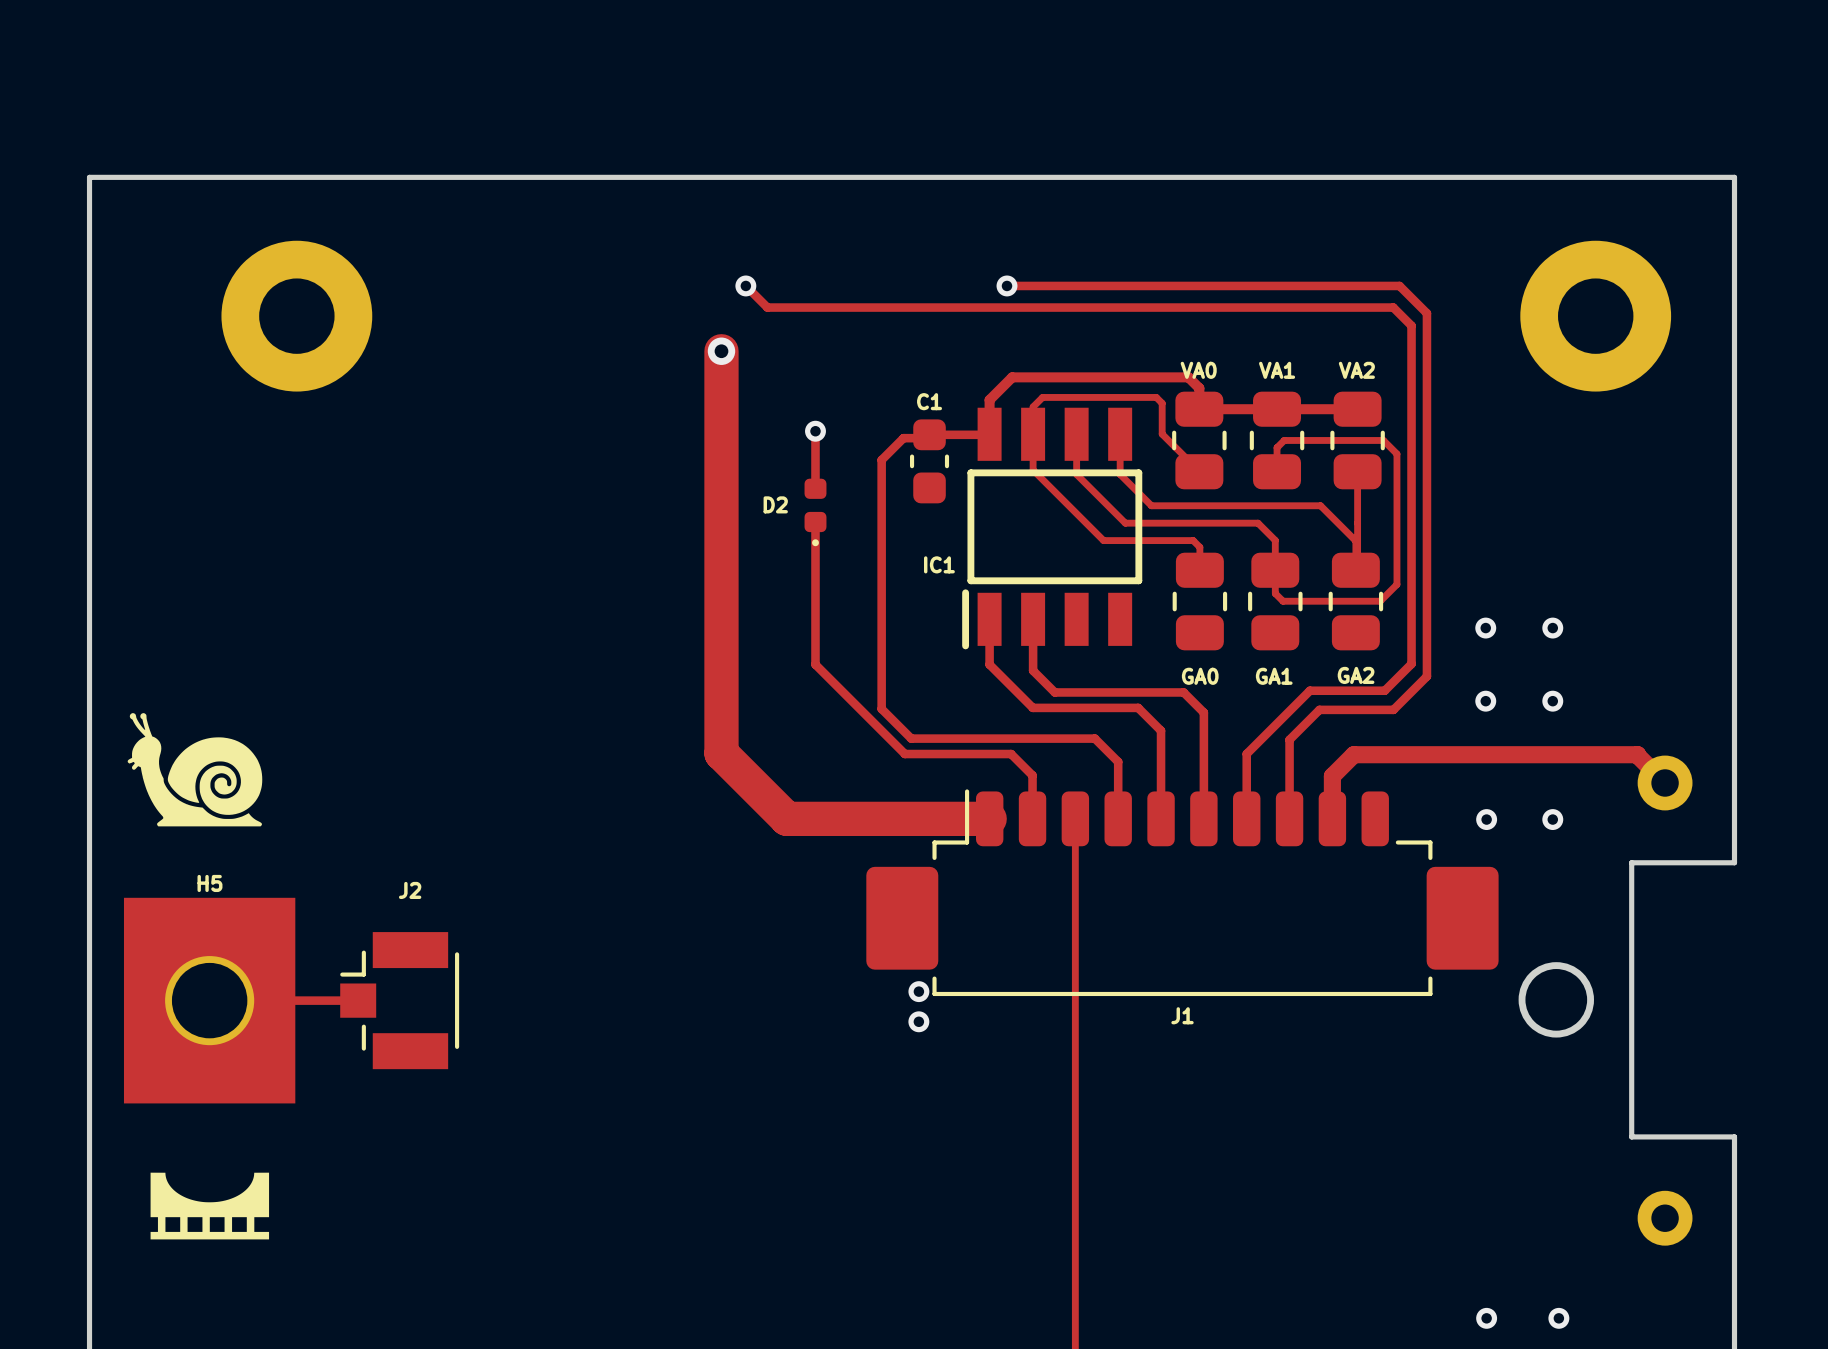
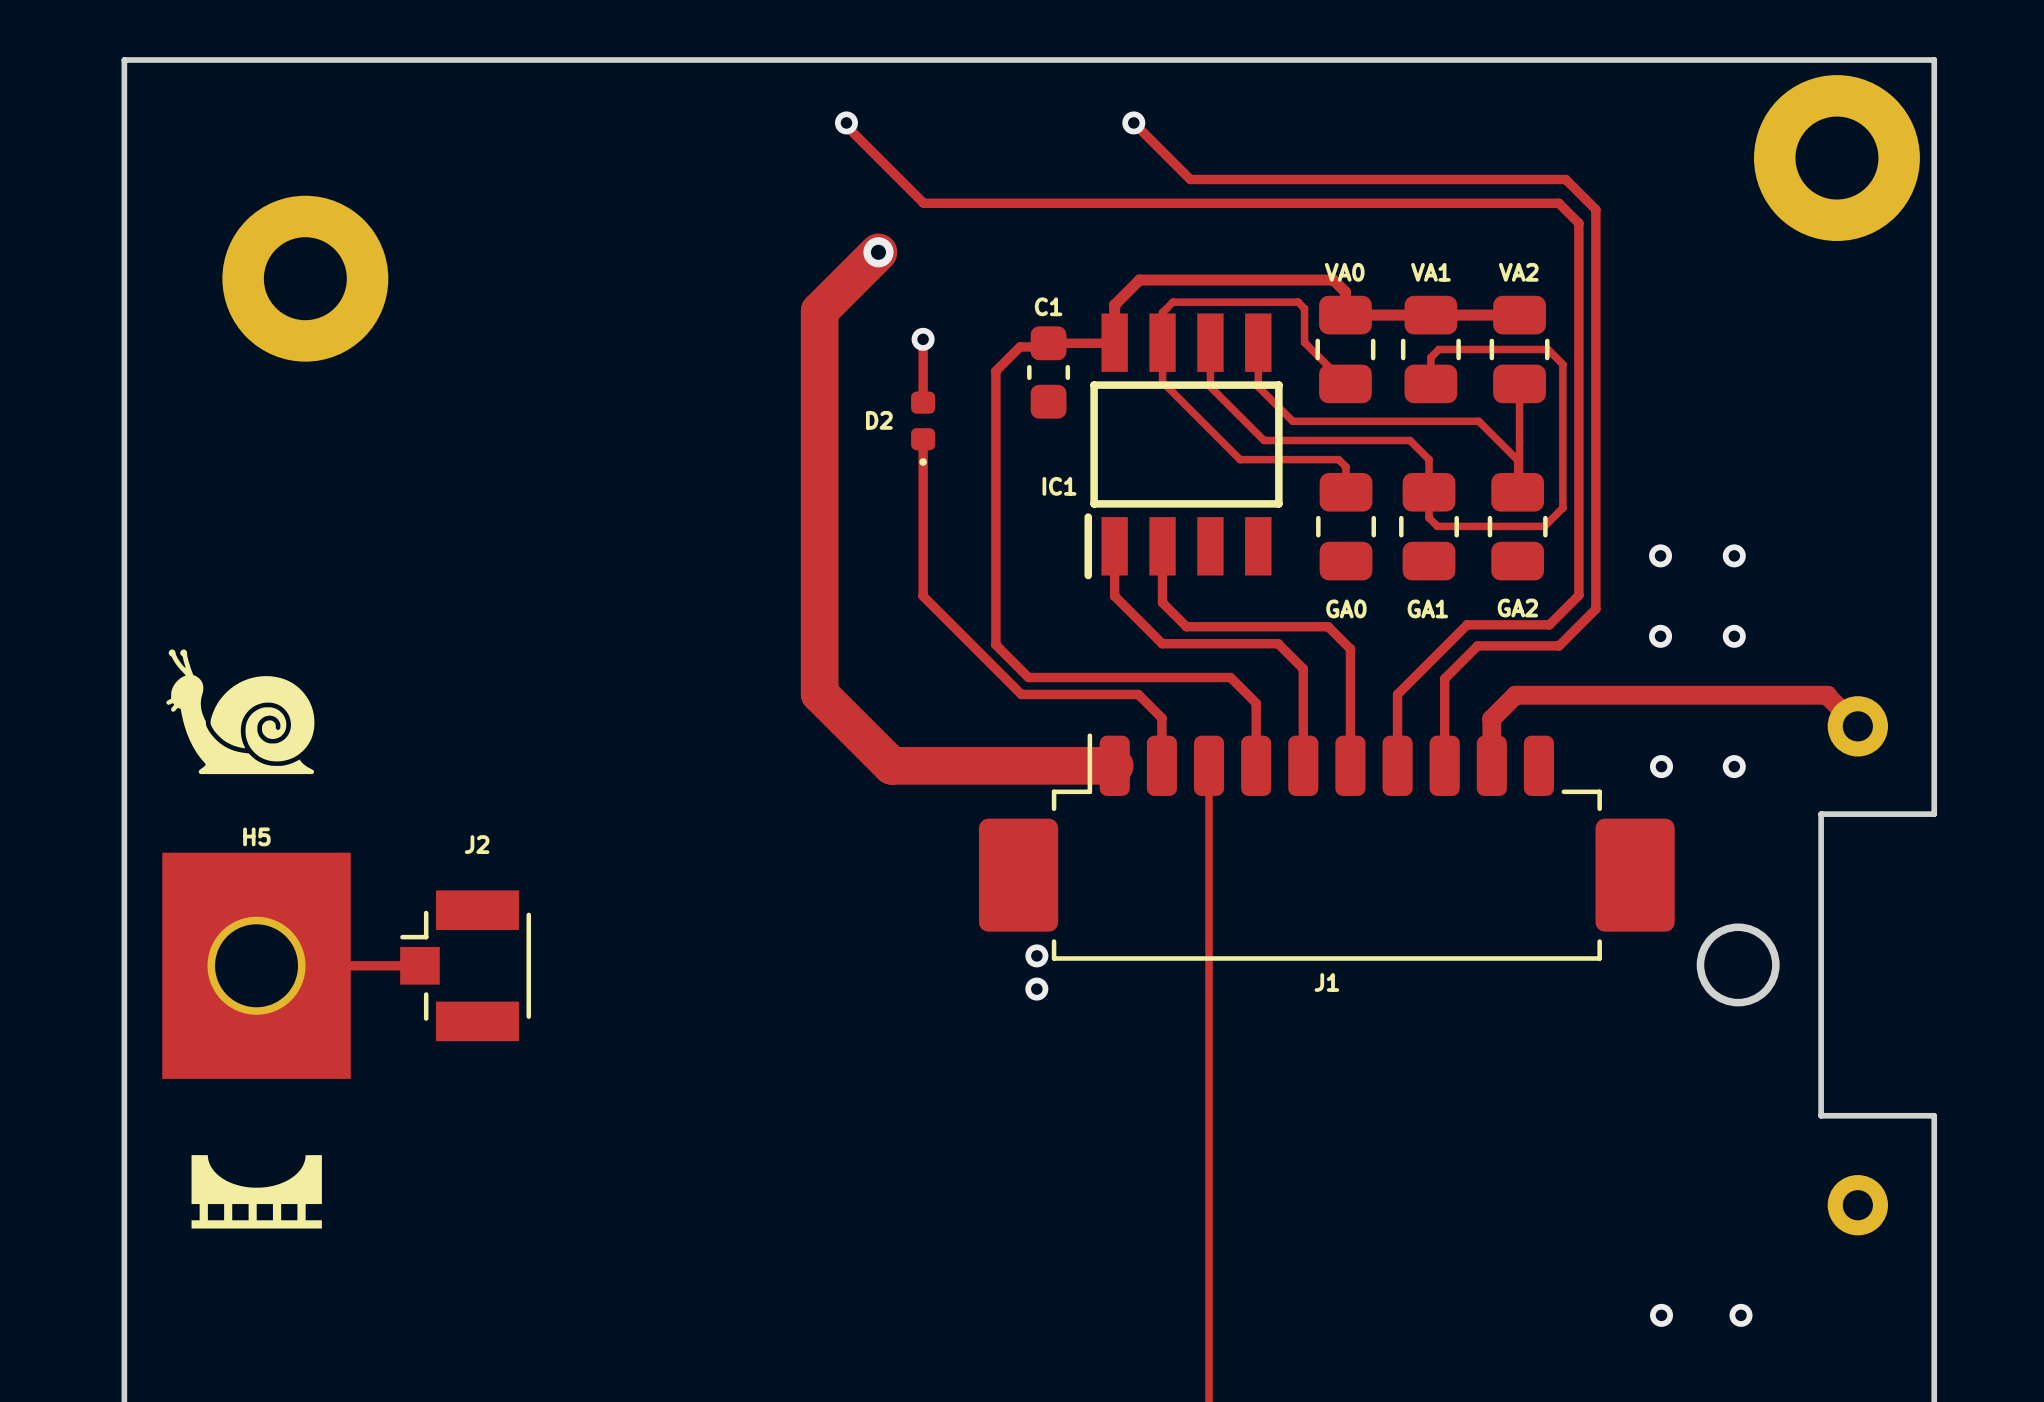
track: (745, 285) (767, 307) (816, 307) -> (846, 122) (846, 126) (923, 203)
via position: (745, 285) -> (846, 122)
track: (1006, 285) (1058, 285) -> (1133, 122) (1190, 179)
via position: (1006, 285) -> (1133, 122)
part position: (296, 316) -> (305, 278)
part position: (1595, 316) -> (1836, 158)
track: (721, 349) (721, 405) -> (878, 252) (819, 311)
via position: (721, 351) -> (878, 252)

